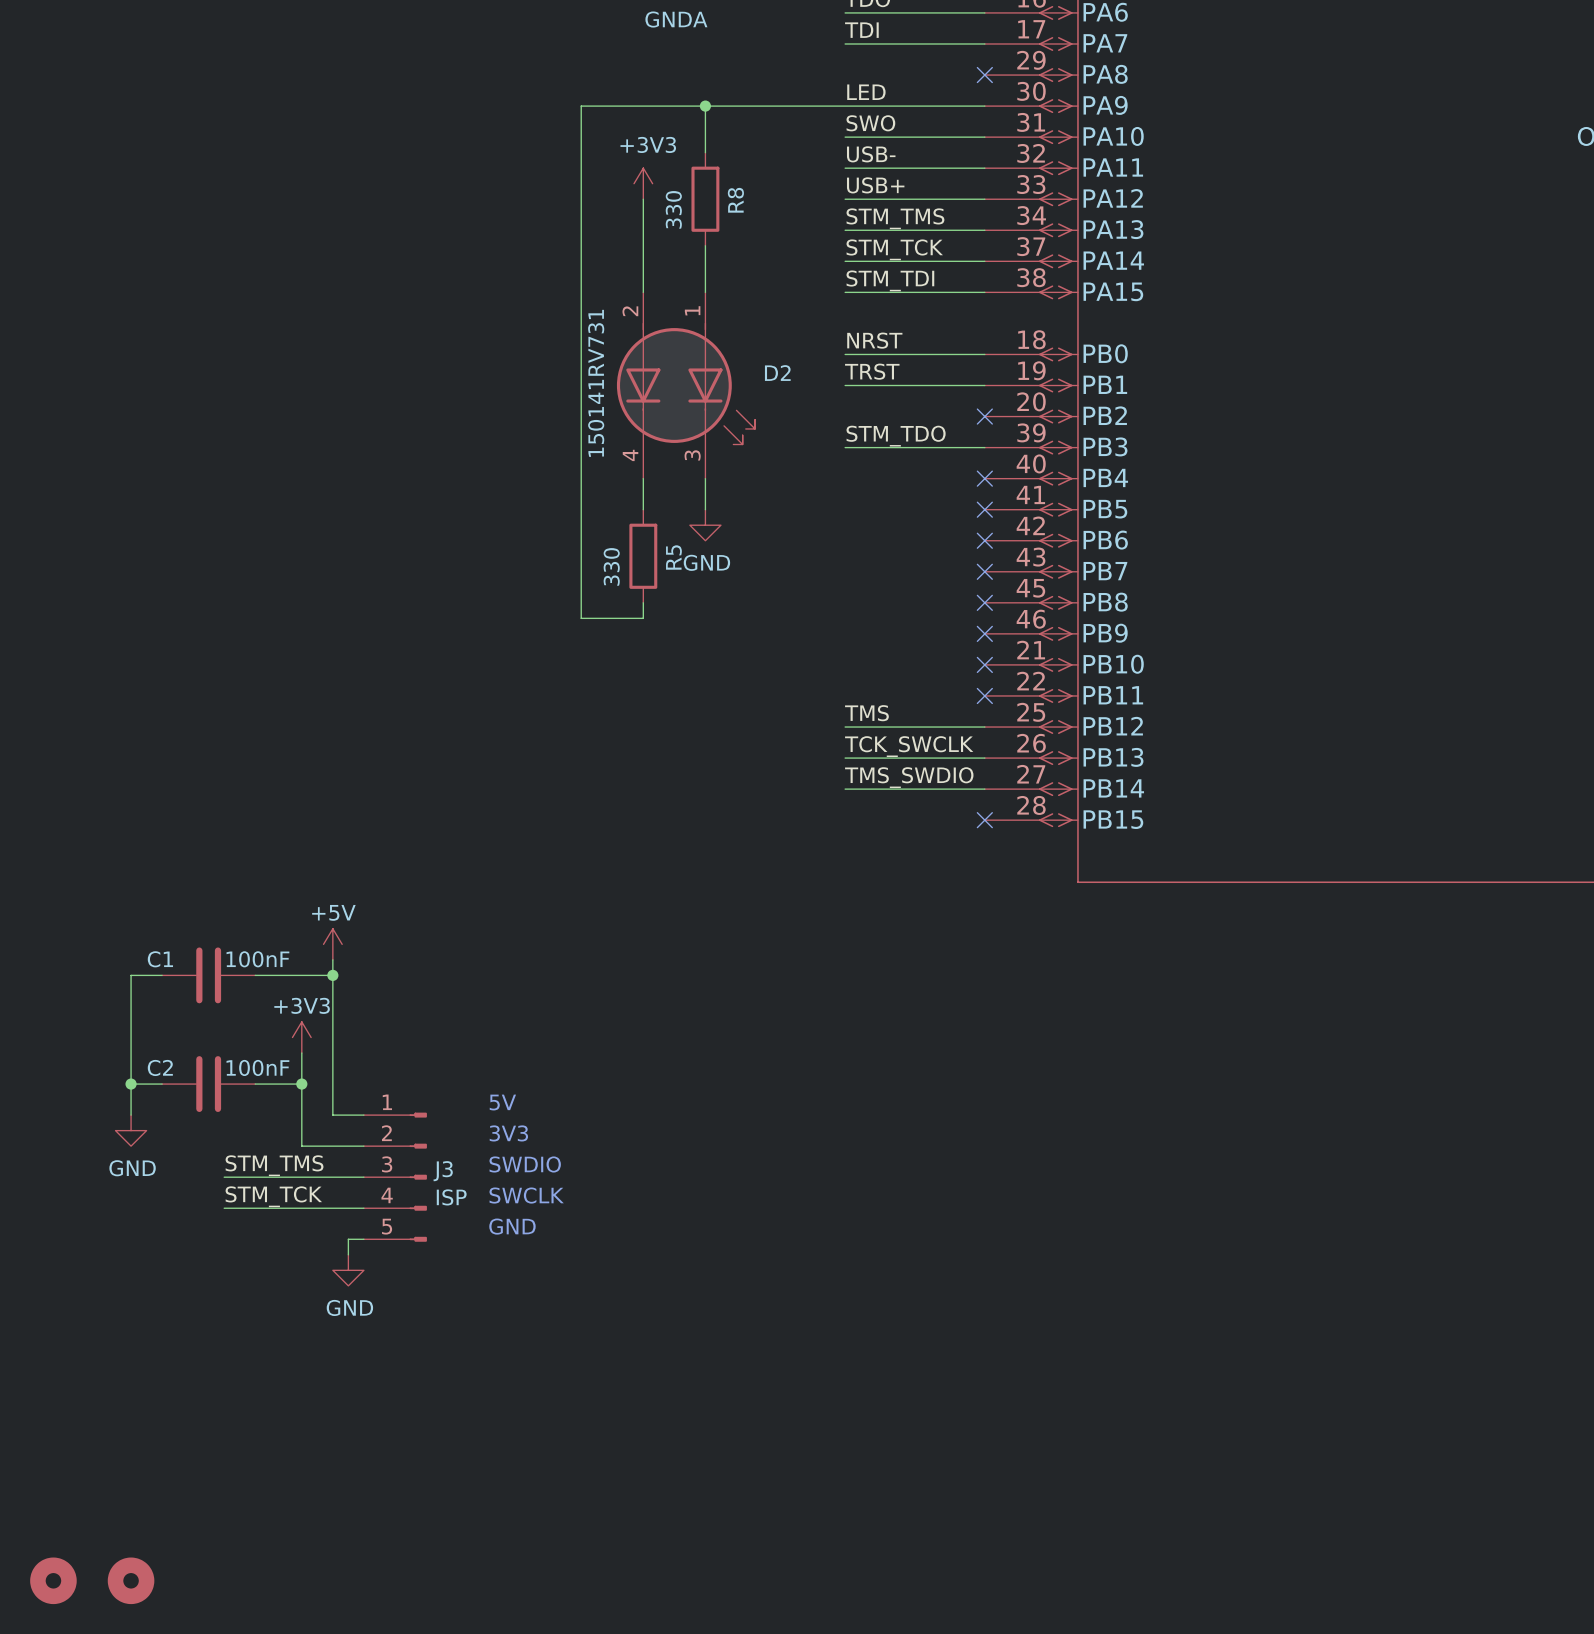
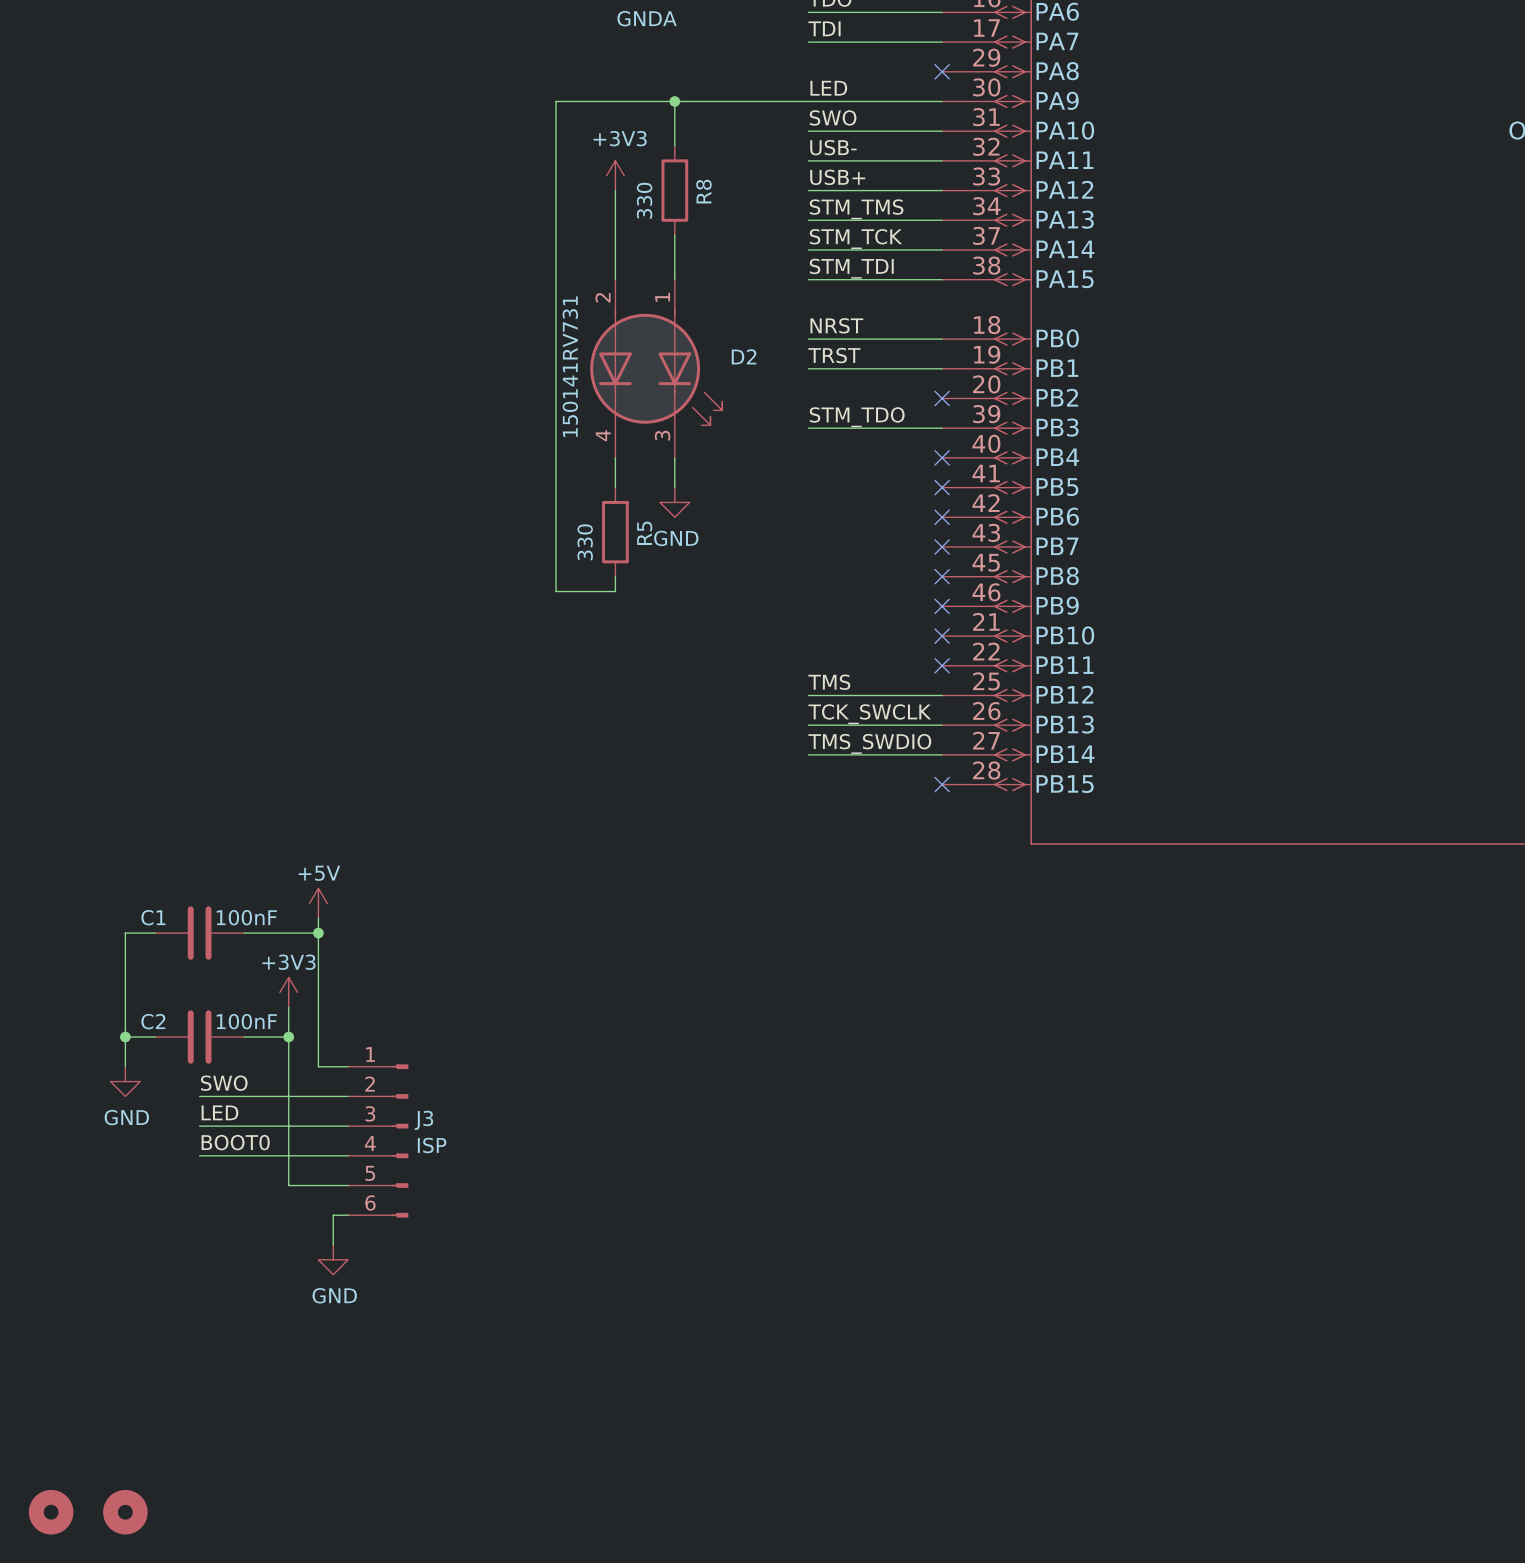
text: 5V (502, 1102) -> none
J3 symbol: [363, 1112, 427, 1242] -> [348, 1064, 409, 1218]
label: none -> SWO (224, 1083)
text: 3V3 (508, 1133) -> none
label: none -> LED (219, 1112)
text: SWDIO (525, 1164) -> none
label: STM_TMS (274, 1165) -> none
wire: none -> (199, 1126) (214, 1126)
label: none -> BOOT0 (235, 1142)
text: SWCLK (526, 1195) -> none
label: STM_TCK (273, 1196) -> none
wire: none -> (199, 1155) (214, 1155)
text: GND (512, 1226) -> none
wire: (348, 1239) (348, 1254) -> (333, 1185) (288, 1185) (288, 1096) (199, 1096)
power symbol position: GND (348, 1270) -> GND (333, 1259)
wire: none -> (348, 1215) (333, 1215) (333, 1244)

